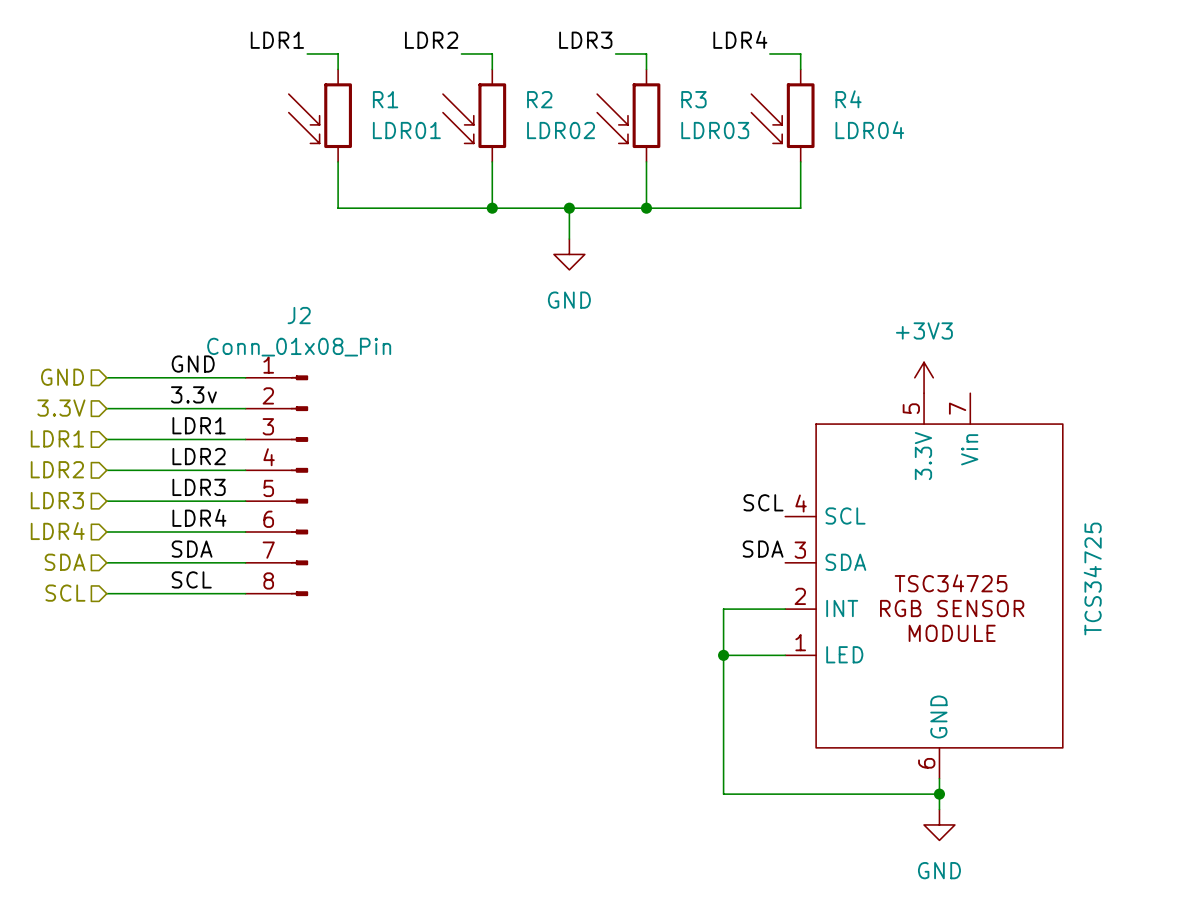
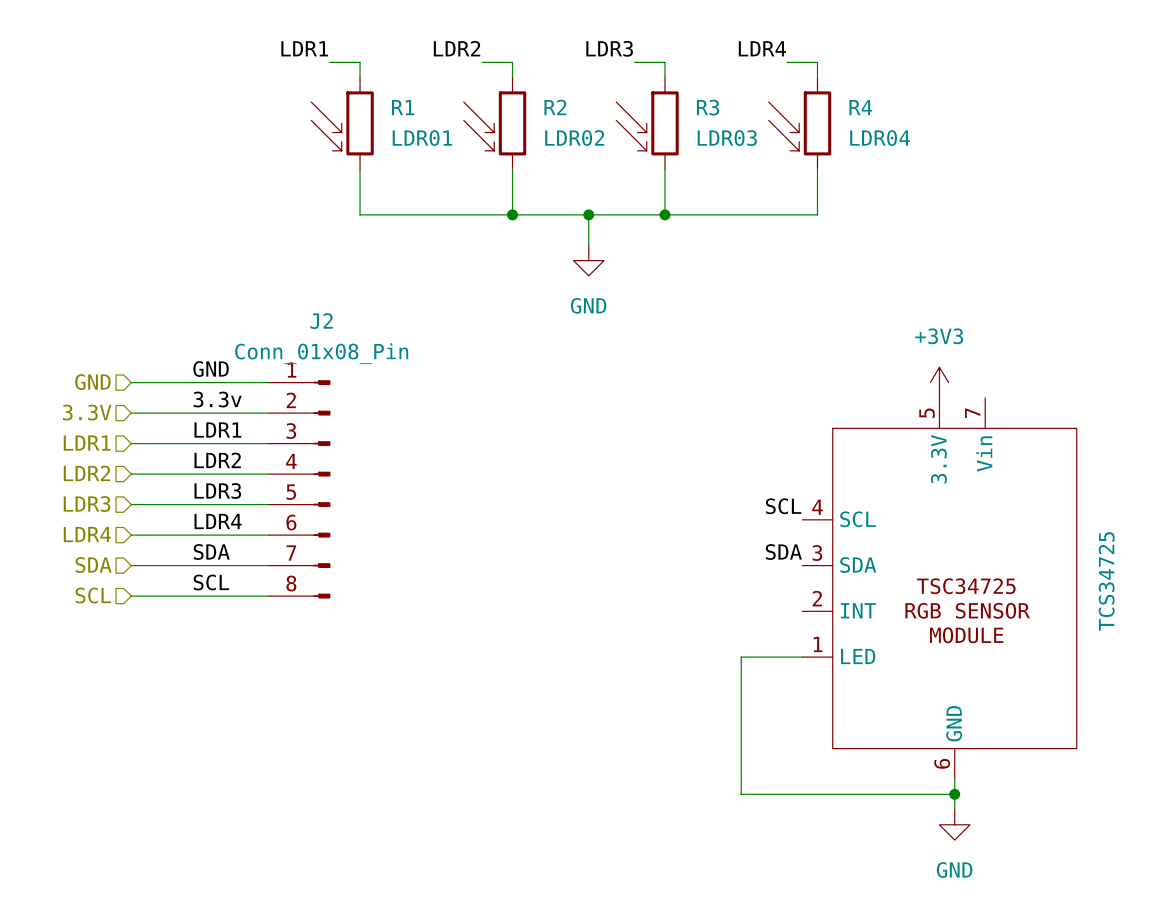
wire: (785, 609) (723, 609) (723, 655) -> none
junction: (723, 655) -> none

